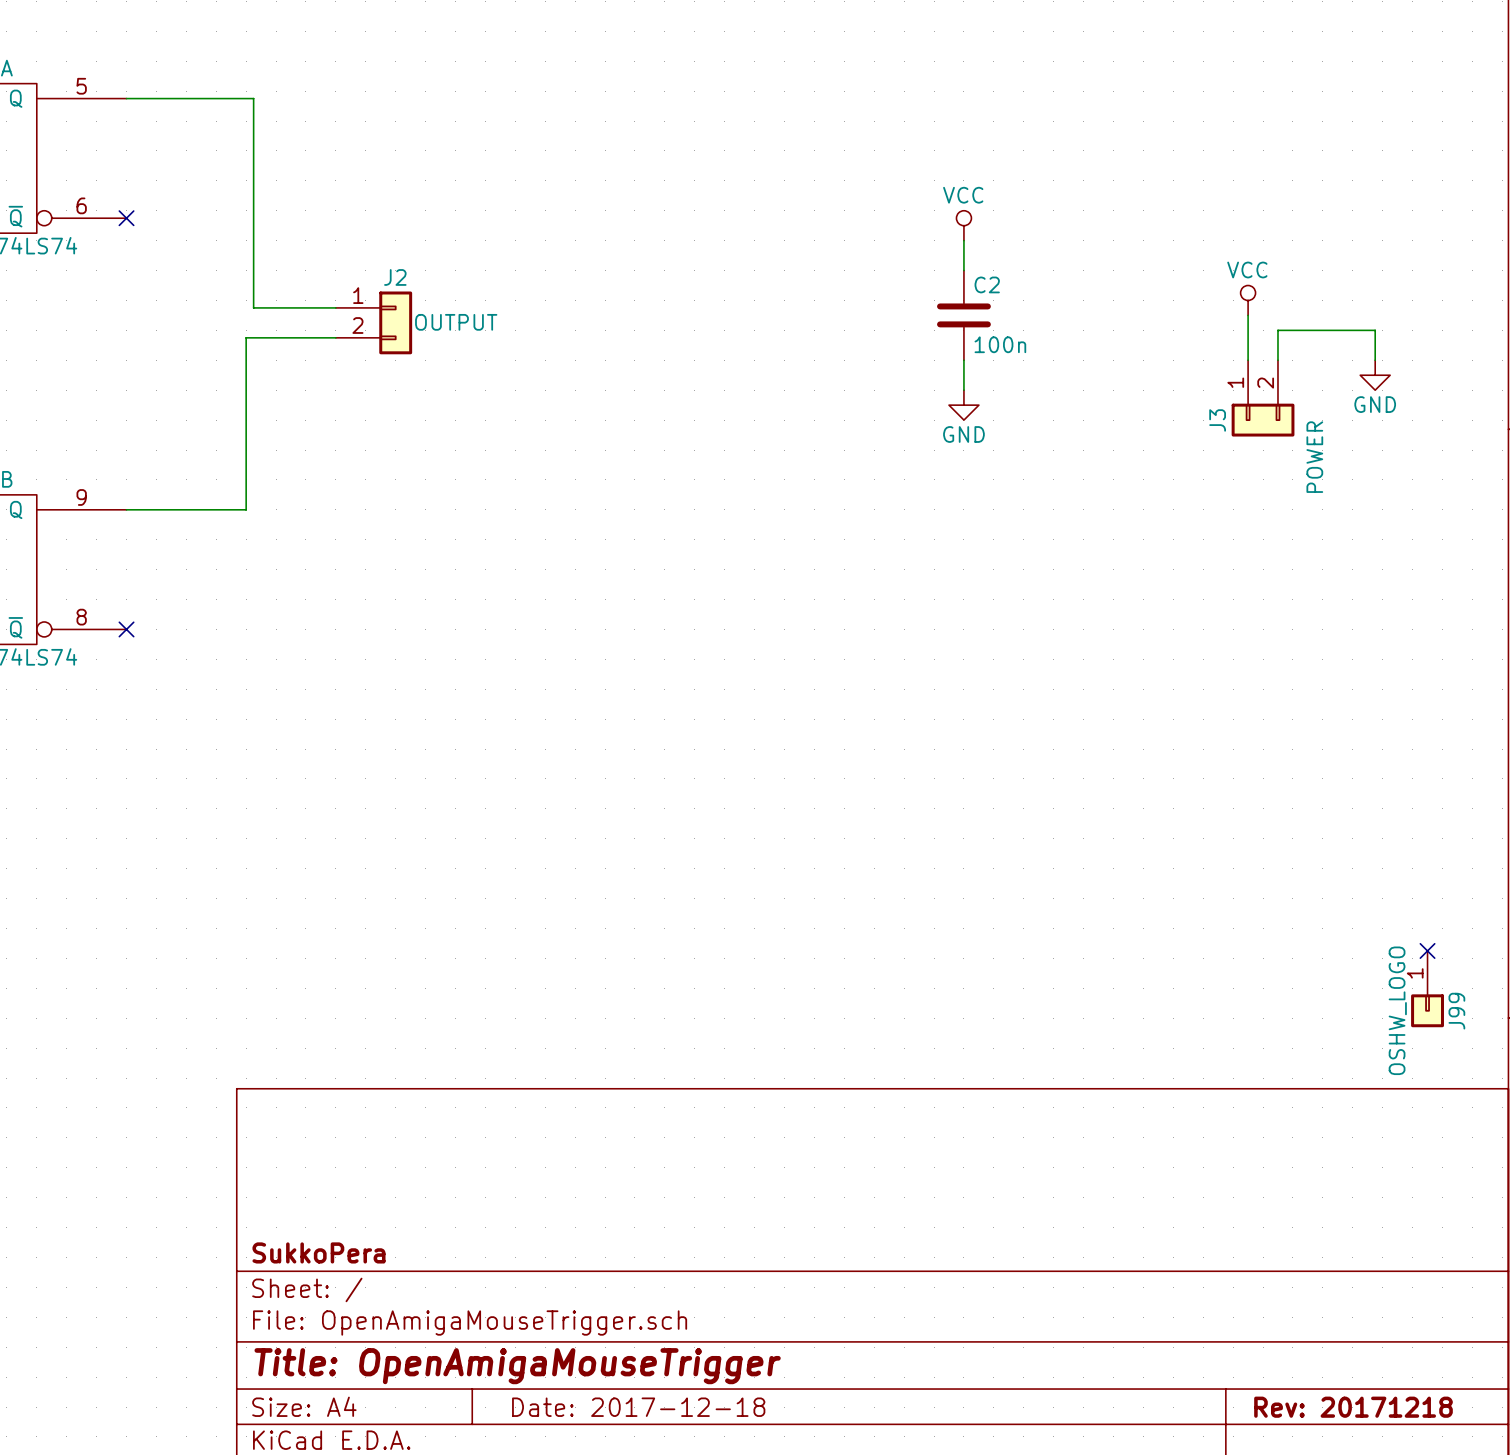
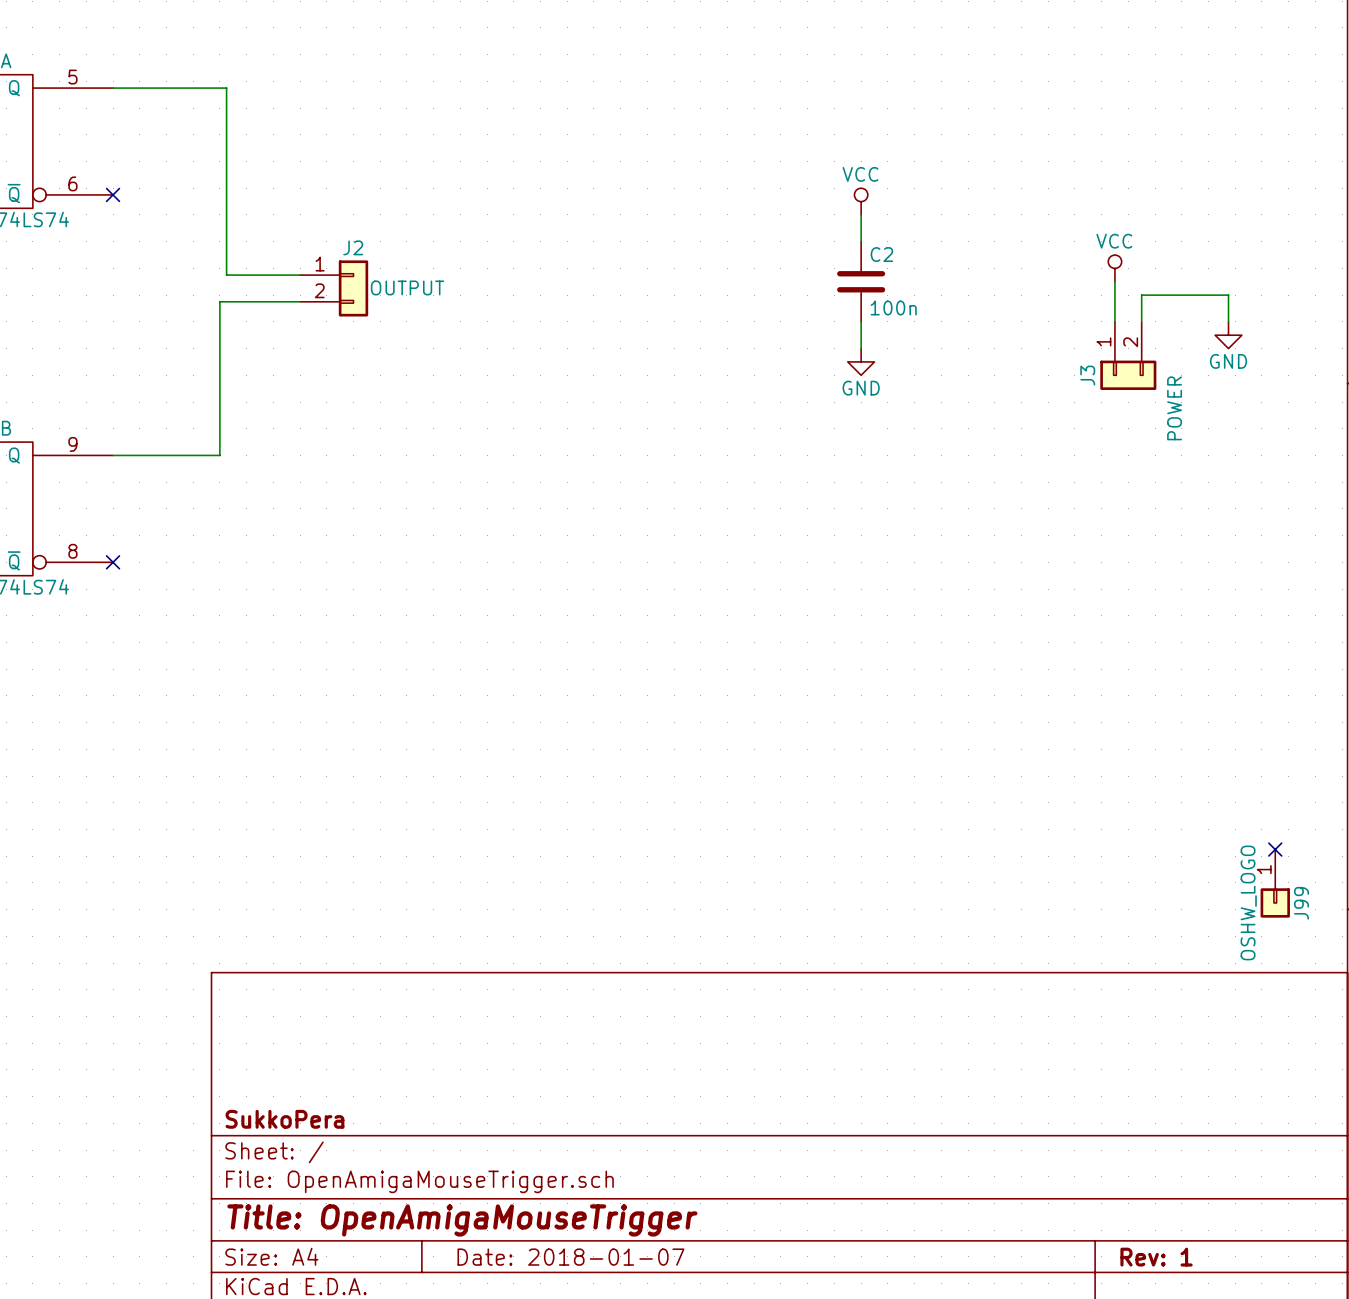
title block: Date: 2017-12-18 (638, 1407) -> Date: 2018-01-07 (570, 1257)
title block: Rev: 20171218 (1353, 1407) -> Rev: 1 (1156, 1257)

